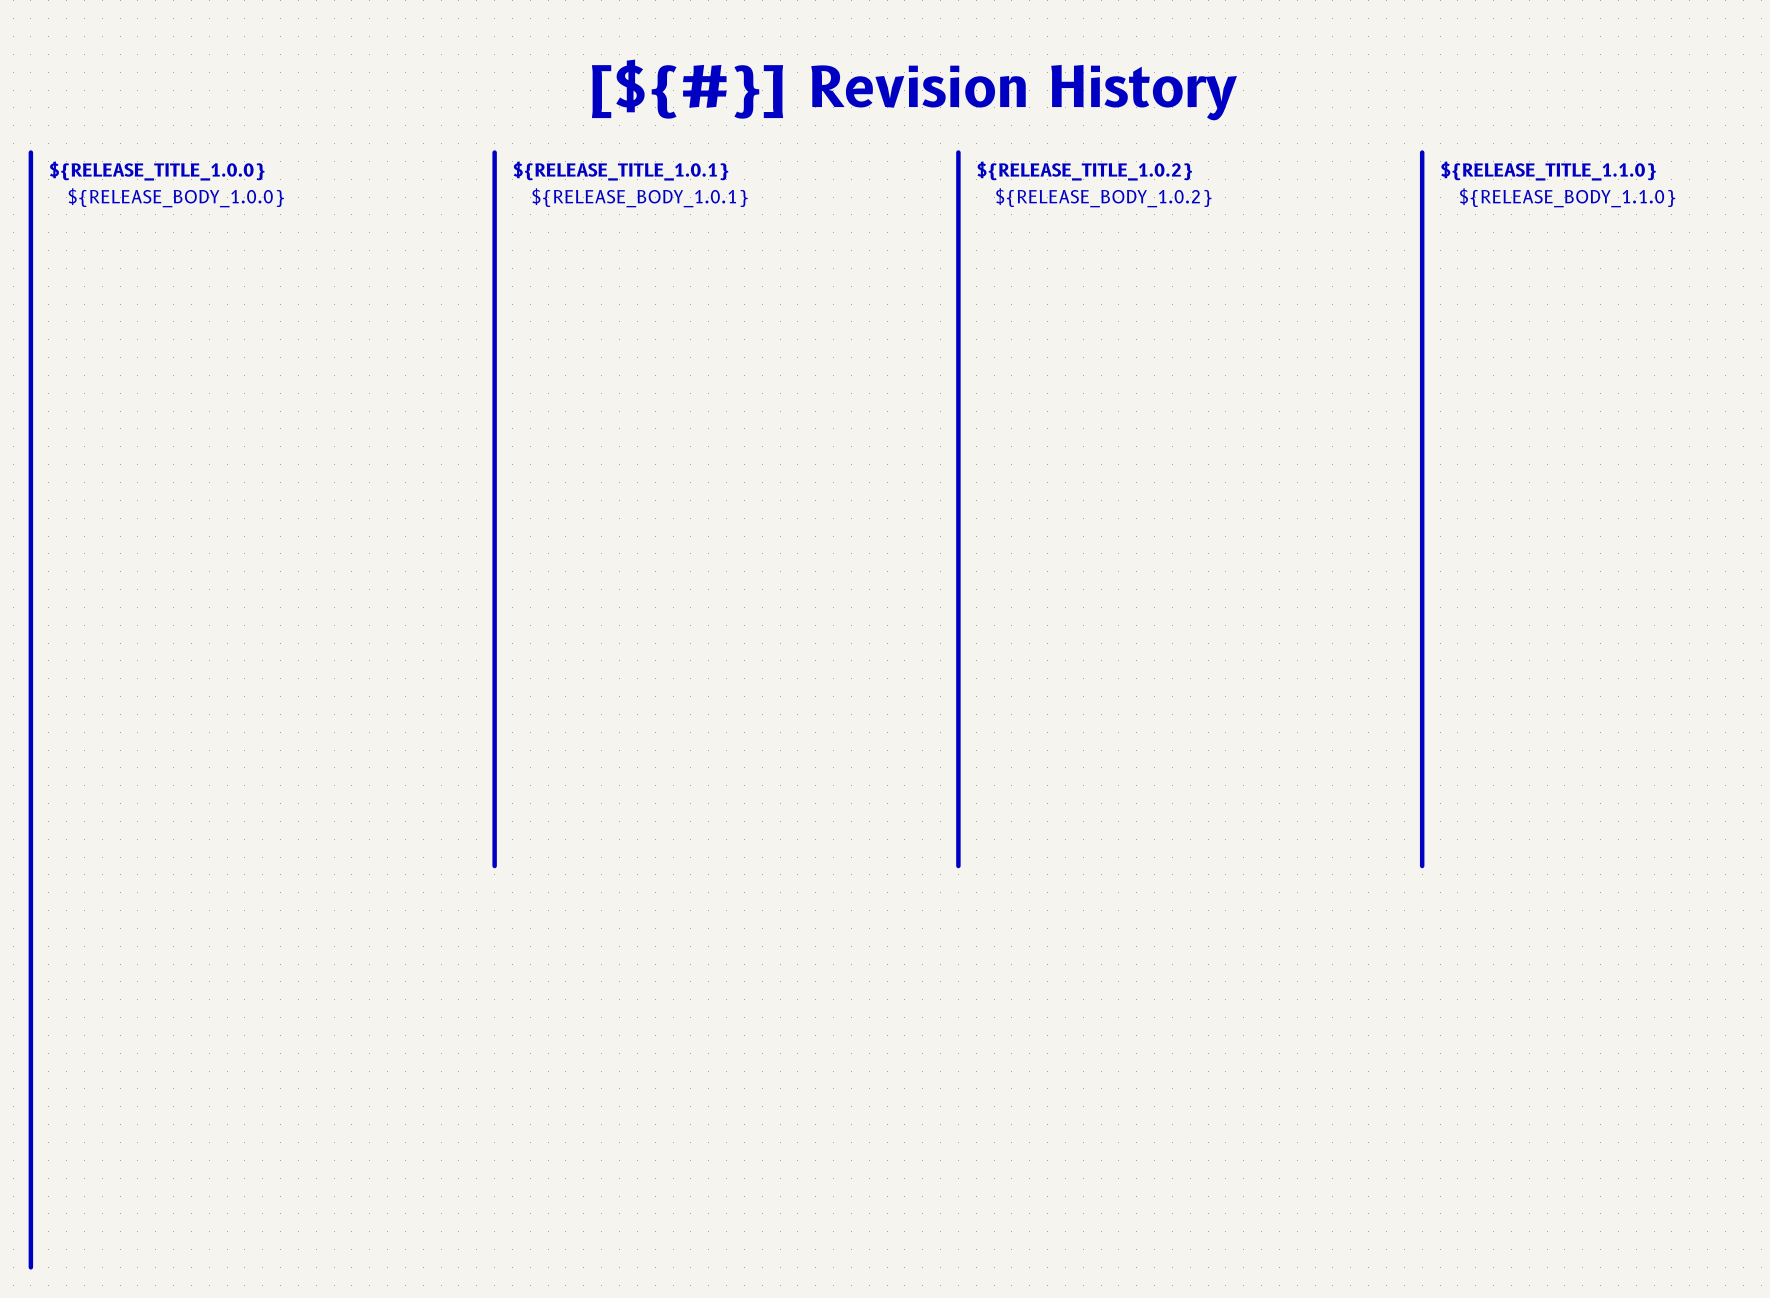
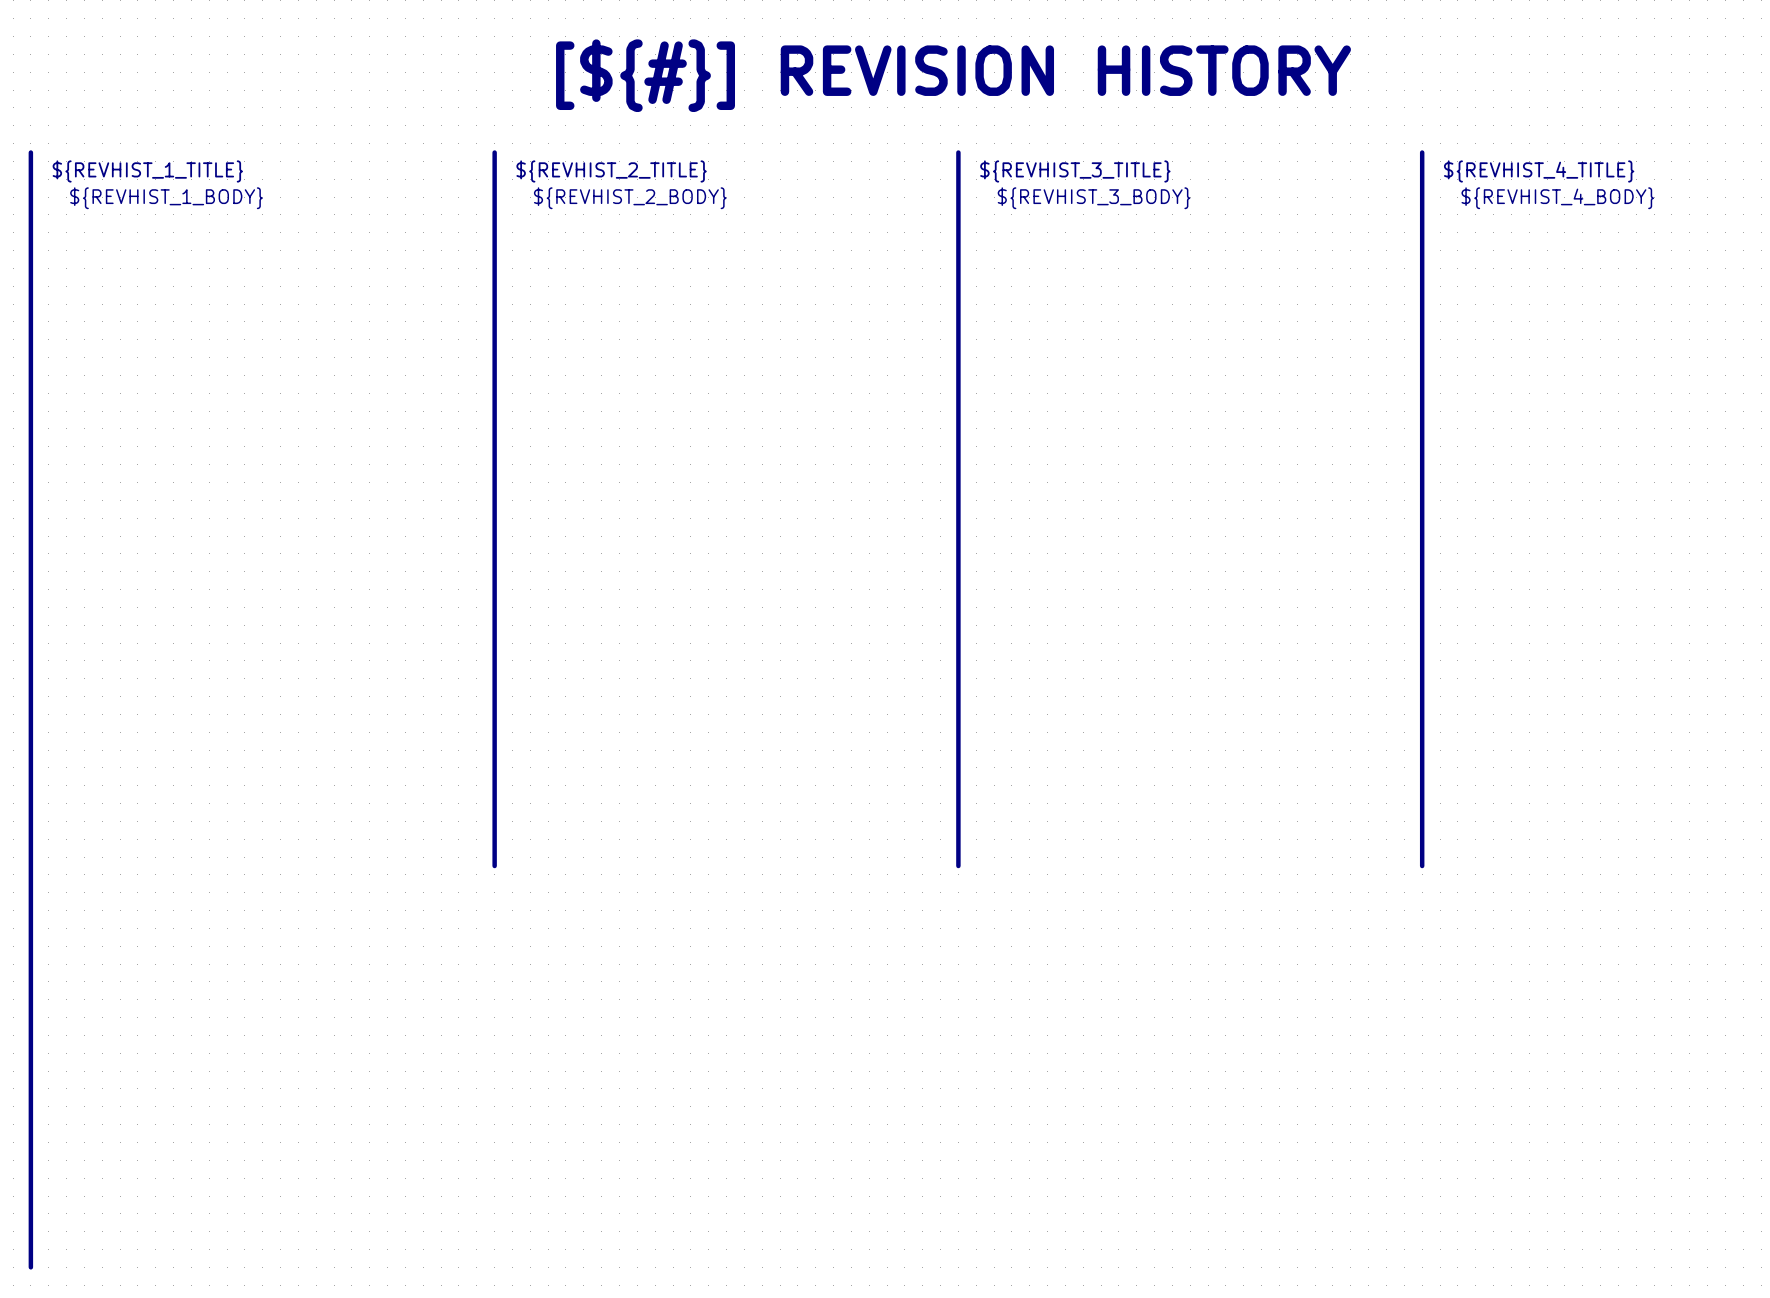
text: none -> [${#}] REVISION HISTORY (953, 75)
text: [${#}] Revision History (914, 89) -> none
text: ${RELEASE_TITLE_1.0.0} (157, 171) -> ${REVHIST_1_TITLE} (147, 171)
text: ${RELEASE_TITLE_1.0.1} (620, 171) -> ${REVHIST_2_TITLE} (611, 171)
text: ${RELEASE_TITLE_1.0.2} (1084, 171) -> ${REVHIST_3_TITLE} (1075, 171)
text: ${RELEASE_TITLE_1.1.0} (1548, 171) -> ${REVHIST_4_TITLE} (1539, 171)
text: ${RELEASE_BODY_1.0.0} (176, 197) -> ${REVHIST_1_BODY} (166, 198)
text: ${RELEASE_BODY_1.0.1} (640, 197) -> ${REVHIST_2_BODY} (630, 198)
text: ${RELEASE_BODY_1.0.2} (1103, 197) -> ${REVHIST_3_BODY} (1094, 198)
text: ${RELEASE_BODY_1.1.0} (1567, 197) -> ${REVHIST_4_BODY} (1557, 198)

